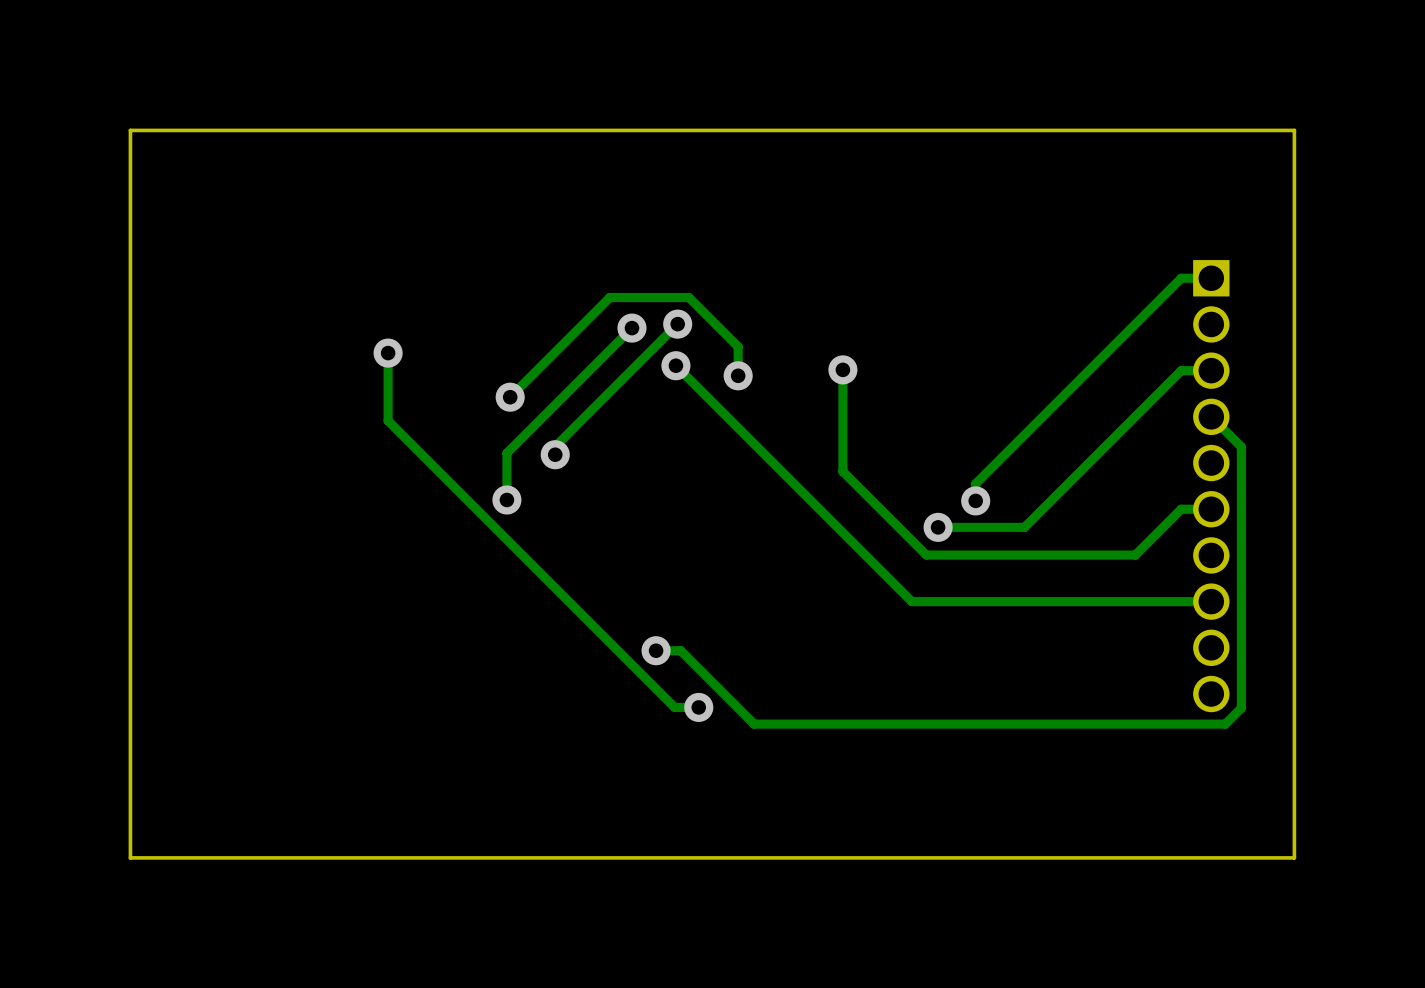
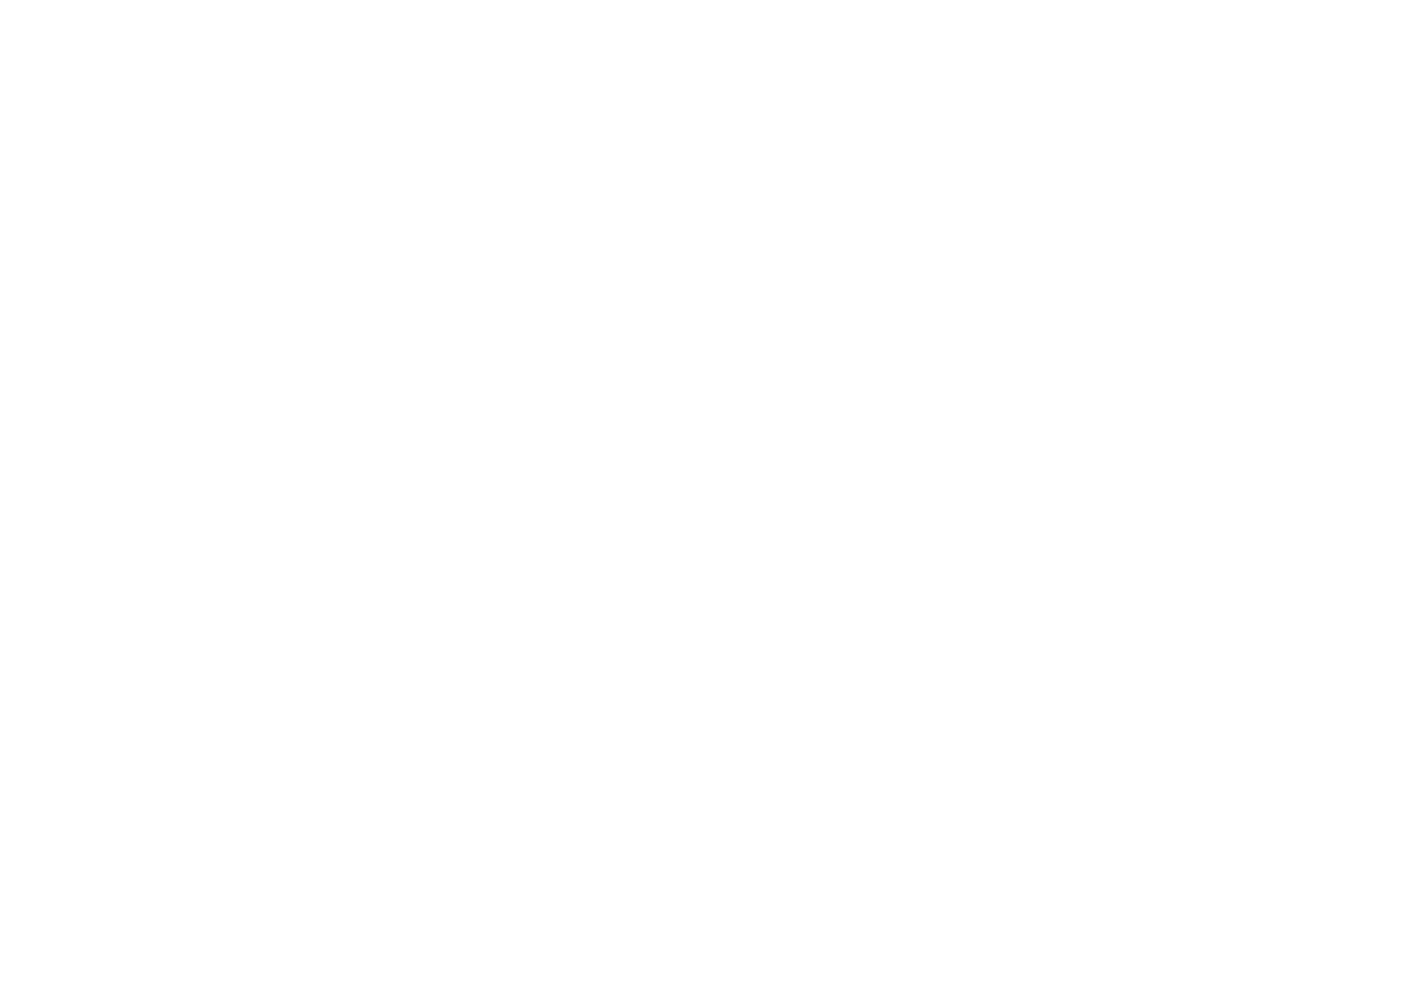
board edge: (1294, 130) (130, 130) (130, 857) (1294, 857) (1294, 130) -> none
track: (1211, 278) (1181, 278) (975, 483) (975, 500) -> none
track: (677, 324) (555, 446) (555, 454) -> none
via: (677, 324) -> none
track: (631, 328) (506, 453) (506, 499) -> none
via: (631, 328) -> none
track: (388, 353) (388, 420) (674, 707) (698, 707) -> none
via: (388, 353) -> none
track: (675, 365) (911, 601) (1211, 601) -> none
via: (675, 365) -> none
track: (842, 369) (842, 471) (926, 555) (1135, 555) (1181, 509) (1211, 509) -> none
via: (842, 369) -> none
track: (1211, 370) (1181, 370) (1024, 527) (938, 527) -> none
track: (738, 375) (738, 346) (688, 297) (609, 297) (510, 397) -> none
via: (738, 375) -> none
via: (510, 397) -> none
track: (1211, 416) (1241, 446) (1241, 708) (1225, 724) (754, 724) (680, 650) (656, 650) -> none
via: (555, 454) -> none
part: (1211, 486) -> none
via: (506, 499) -> none
via: (975, 500) -> none
via: (938, 527) -> none
via: (656, 650) -> none
via: (698, 707) -> none

